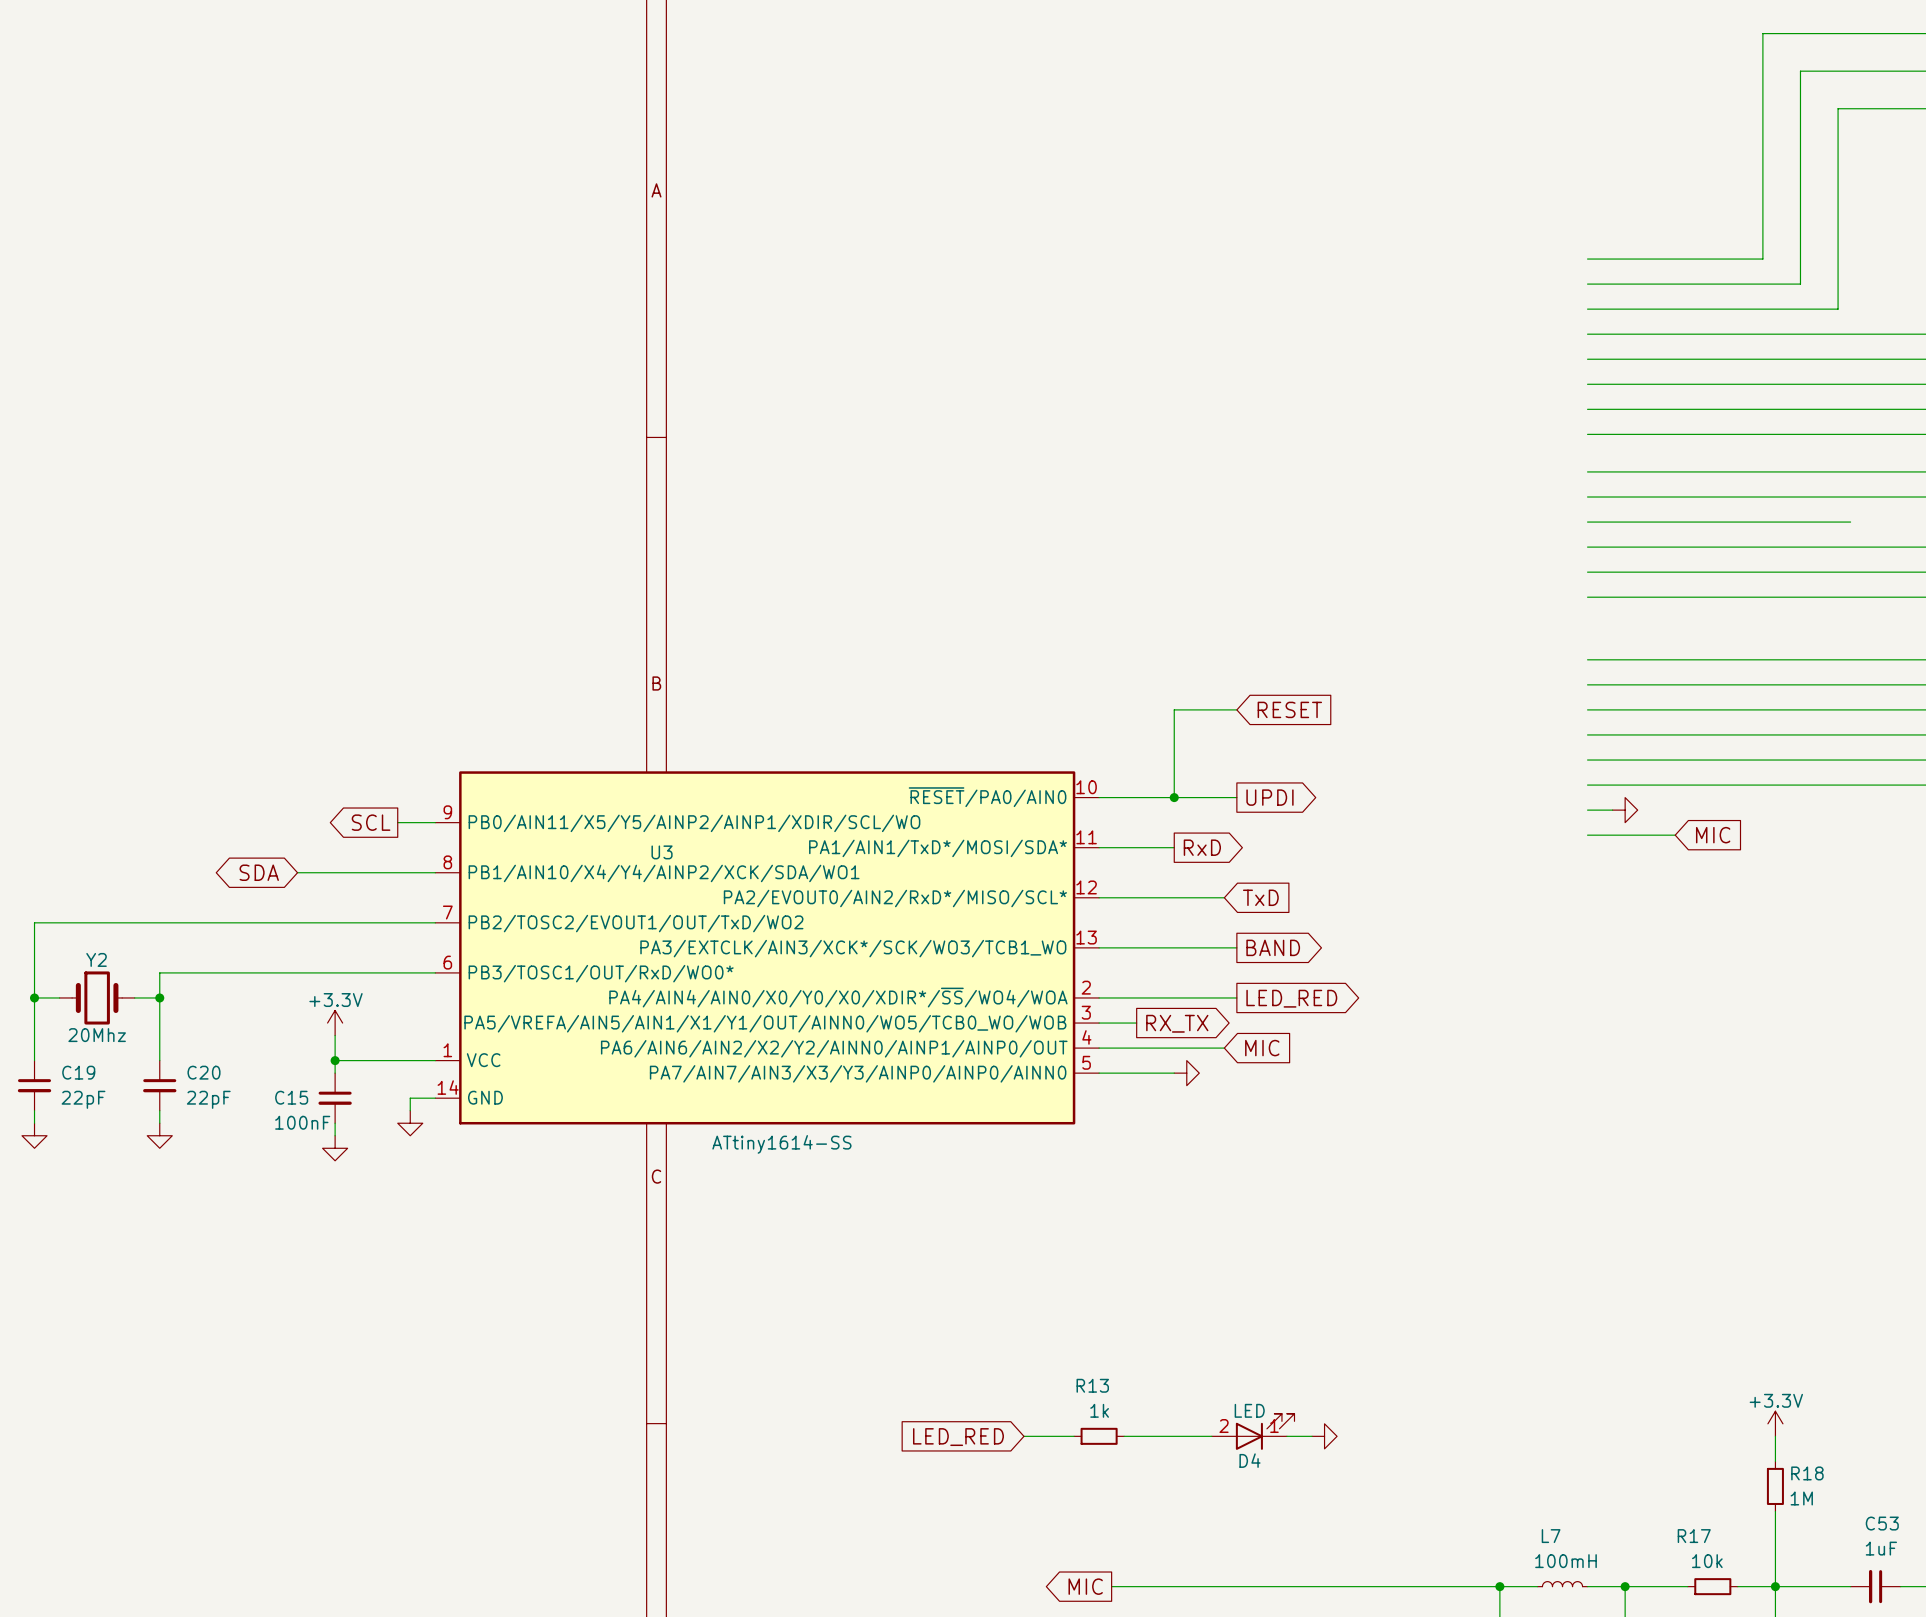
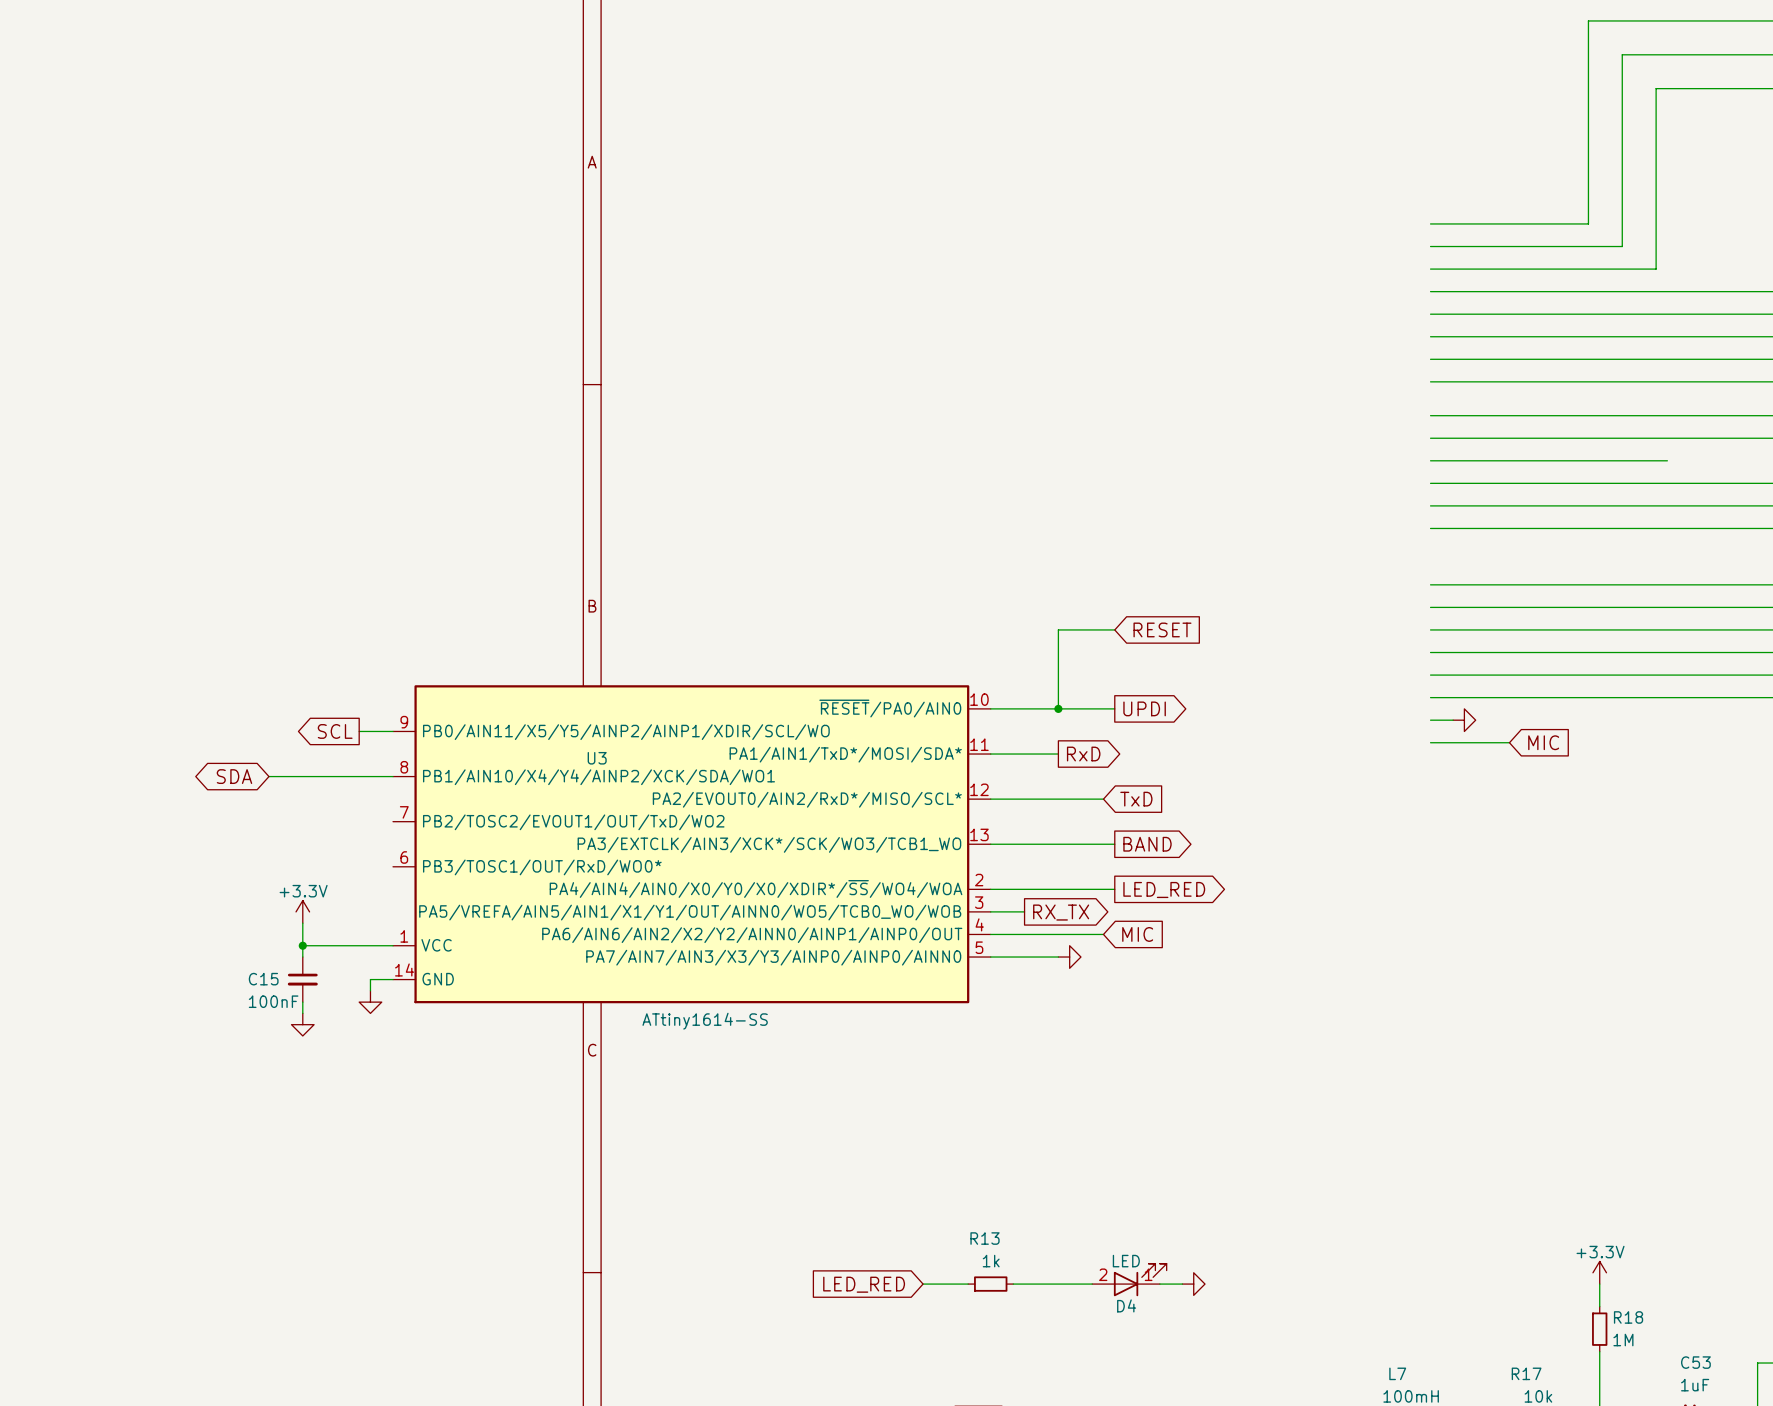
wire: (435, 922) (34, 922) (34, 1060) -> none
wire: (435, 972) (159, 972) (159, 1060) -> none
wire: (34, 997) (59, 997) -> none
junction: (34, 997) -> none
Y2: 20Mhz (97, 997) -> none
wire: (134, 997) (159, 997) -> none
junction: (159, 997) -> none
C19: 22pF (34, 1085) -> none
C20: 22pF (159, 1085) -> none
wire: (34, 1110) (34, 1123) -> none
wire: (159, 1110) (159, 1123) -> none
power symbol: (34, 1135) -> none
power symbol: (159, 1135) -> none

